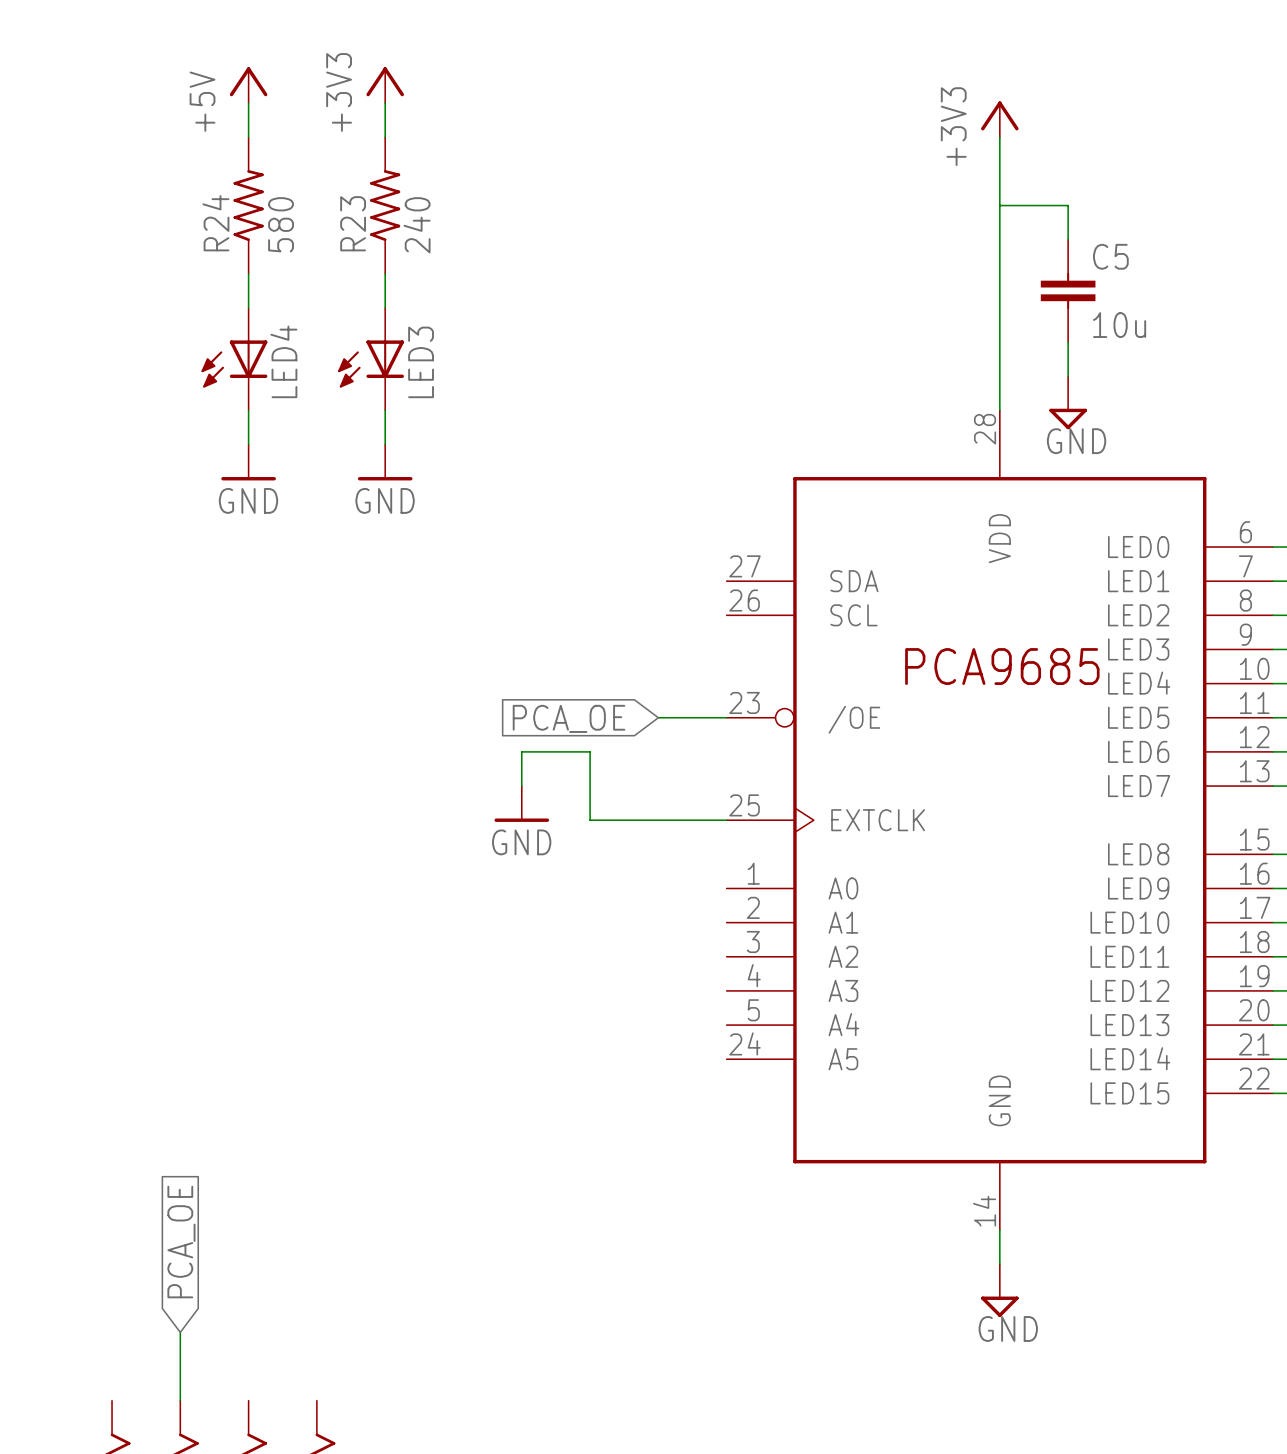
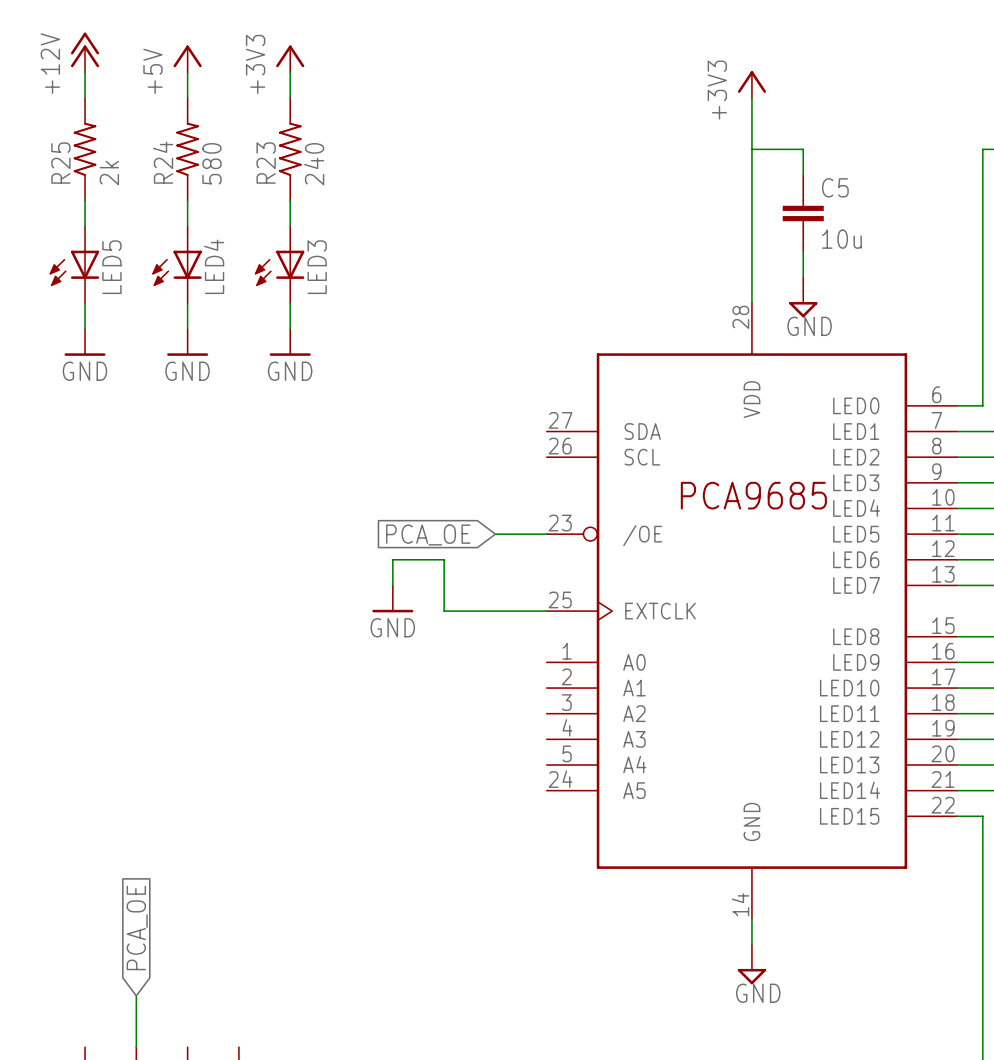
power symbol: none -> +12V (85, 52)
wire: none -> (85, 72) (85, 98)
R25: none -> 2k (85, 149)
wire: none -> (85, 200) (85, 226)
LED5: none -> (74, 264)
wire: none -> (85, 303) (85, 328)
power symbol: none -> GND (85, 342)

